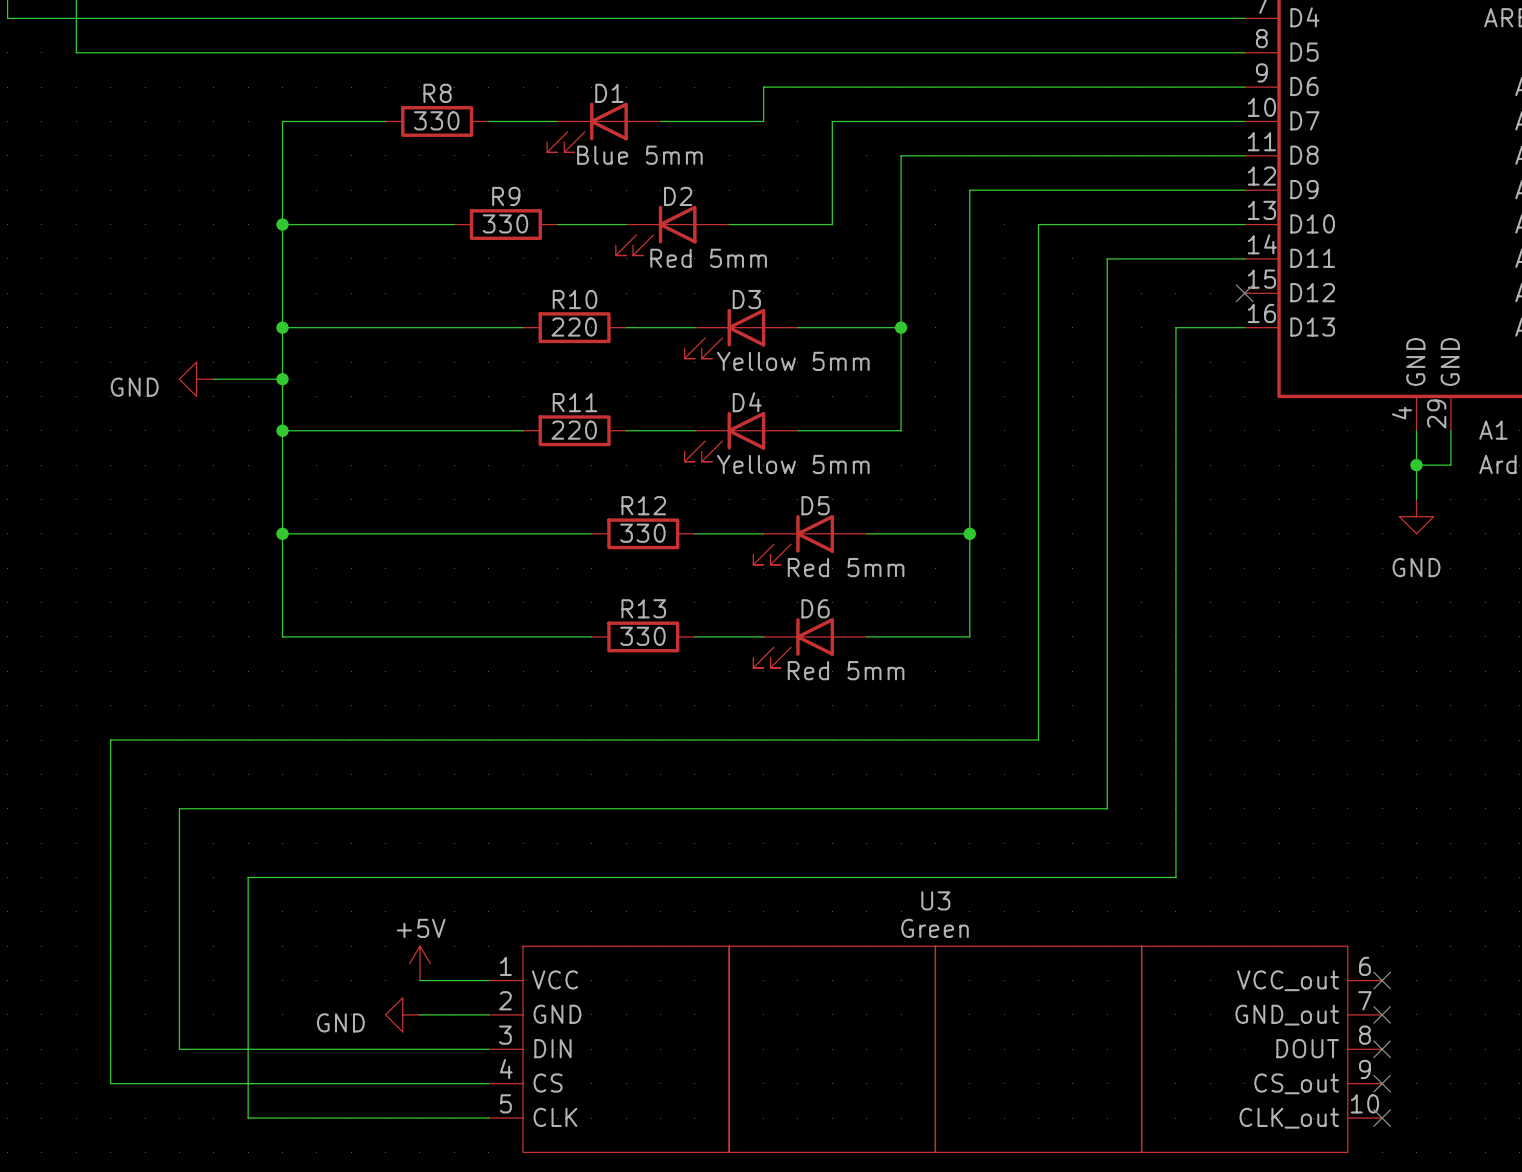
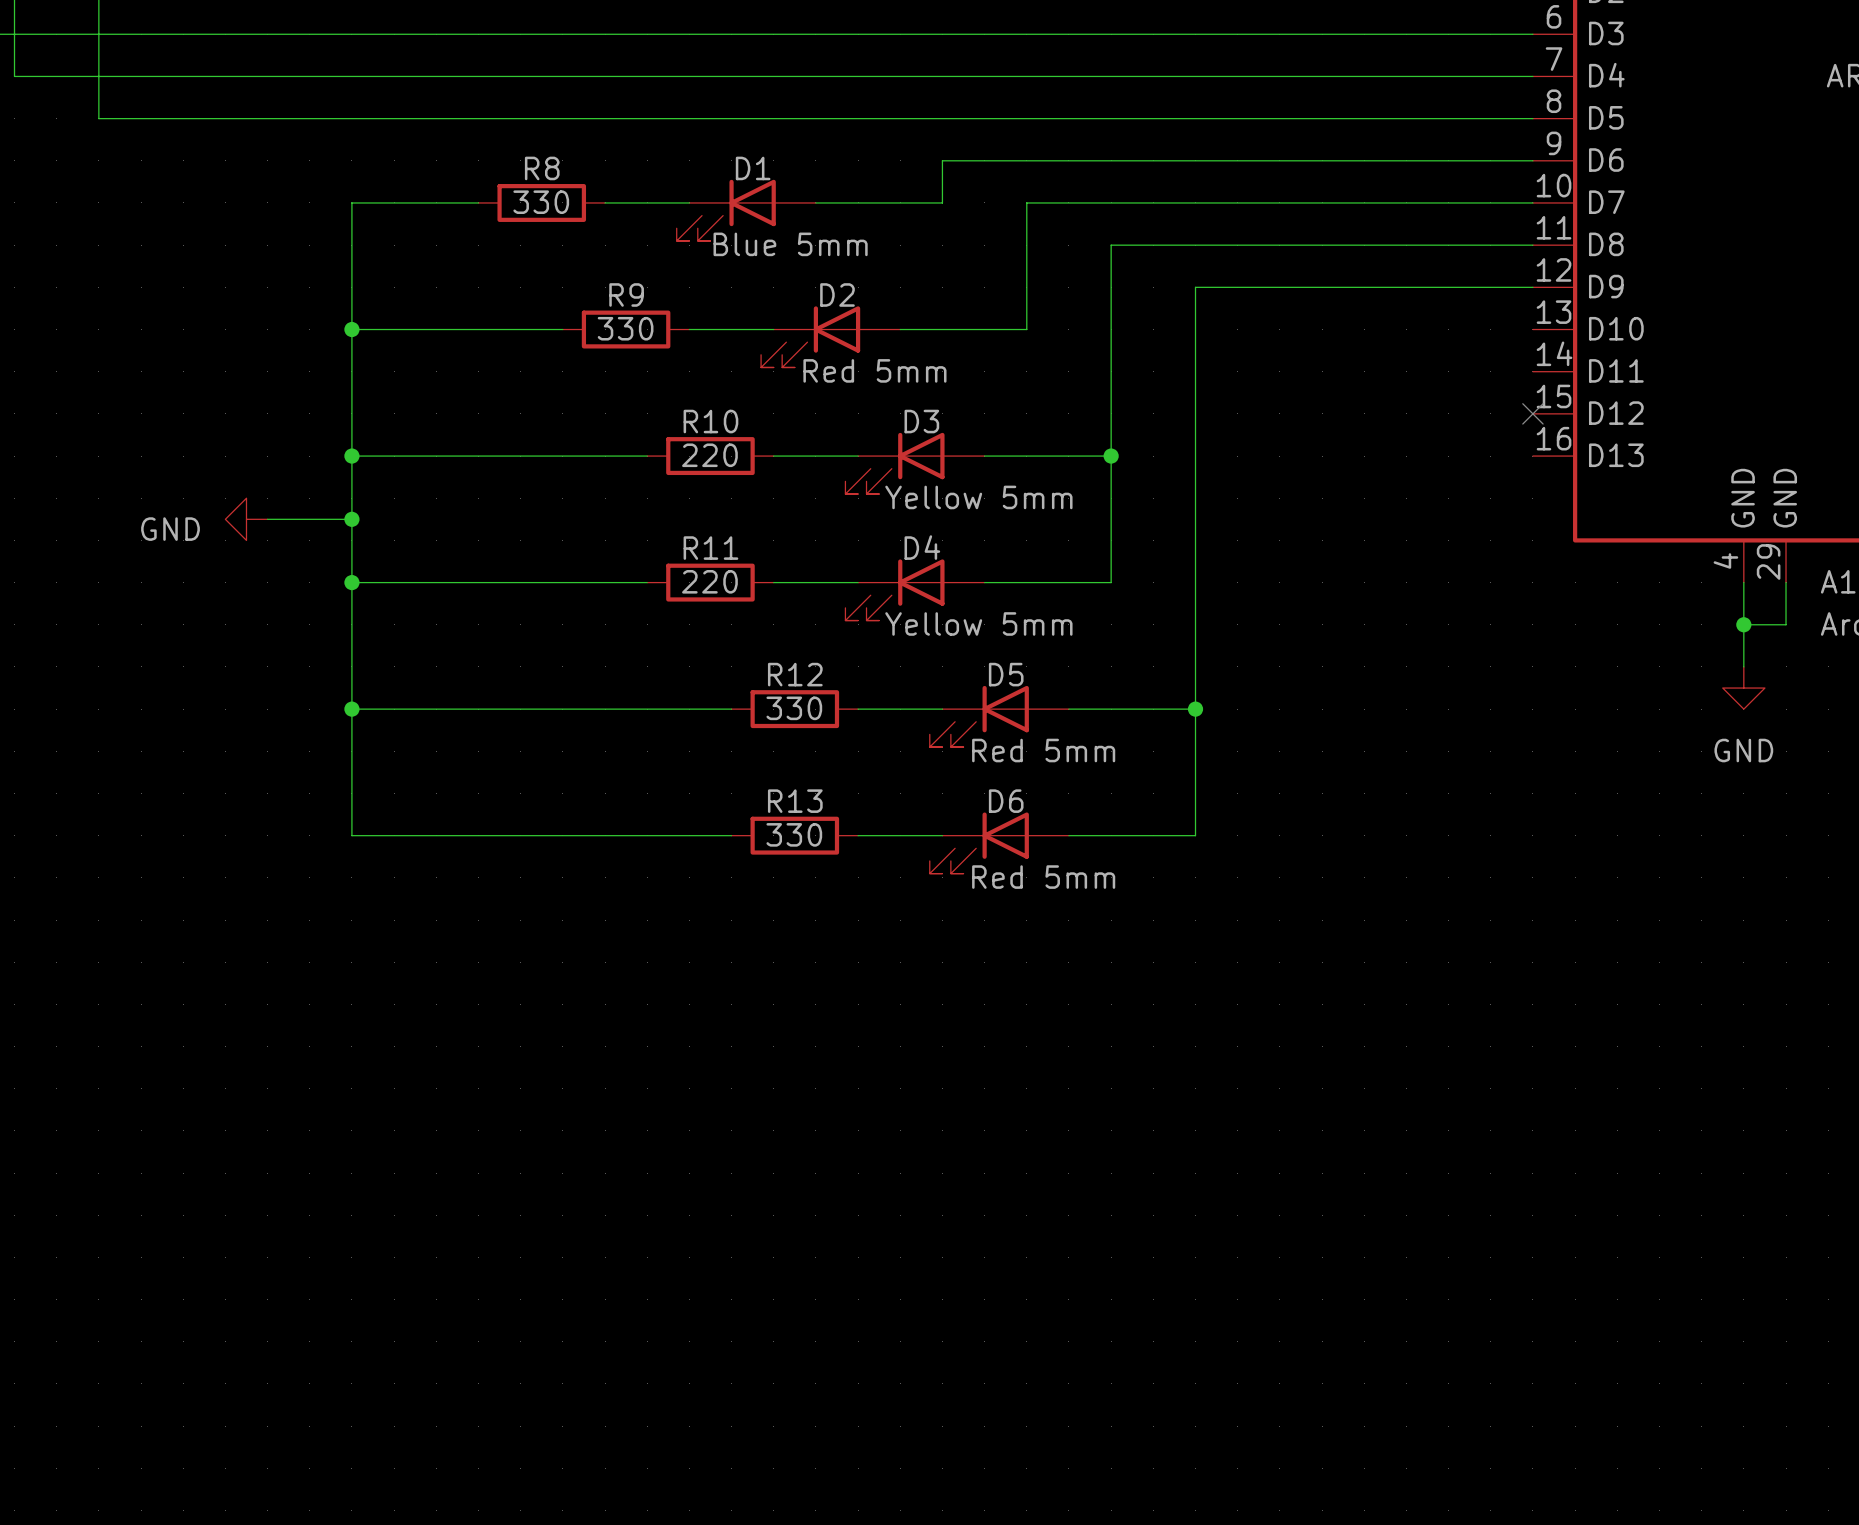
wire: (1244, 224) (1038, 224) (1038, 740) (110, 740) (110, 1083) (488, 1083) -> none
wire: (1244, 258) (1107, 258) (1107, 808) (179, 808) (179, 1049) (488, 1049) -> none
wire: (1244, 327) (1175, 327) (1175, 877) (248, 877) (248, 1118) (488, 1118) -> none
power symbol: +5V (419, 963) -> none
wire: (419, 980) (488, 980) -> none
no-connect mark: (1382, 980) -> none
power symbol: GND (402, 1014) -> none
wire: (419, 1014) (488, 1014) -> none
no-connect mark: (1382, 1014) -> none
U3: Green (935, 1049) -> none
no-connect mark: (1382, 1049) -> none
no-connect mark: (1382, 1083) -> none
no-connect mark: (1382, 1118) -> none

